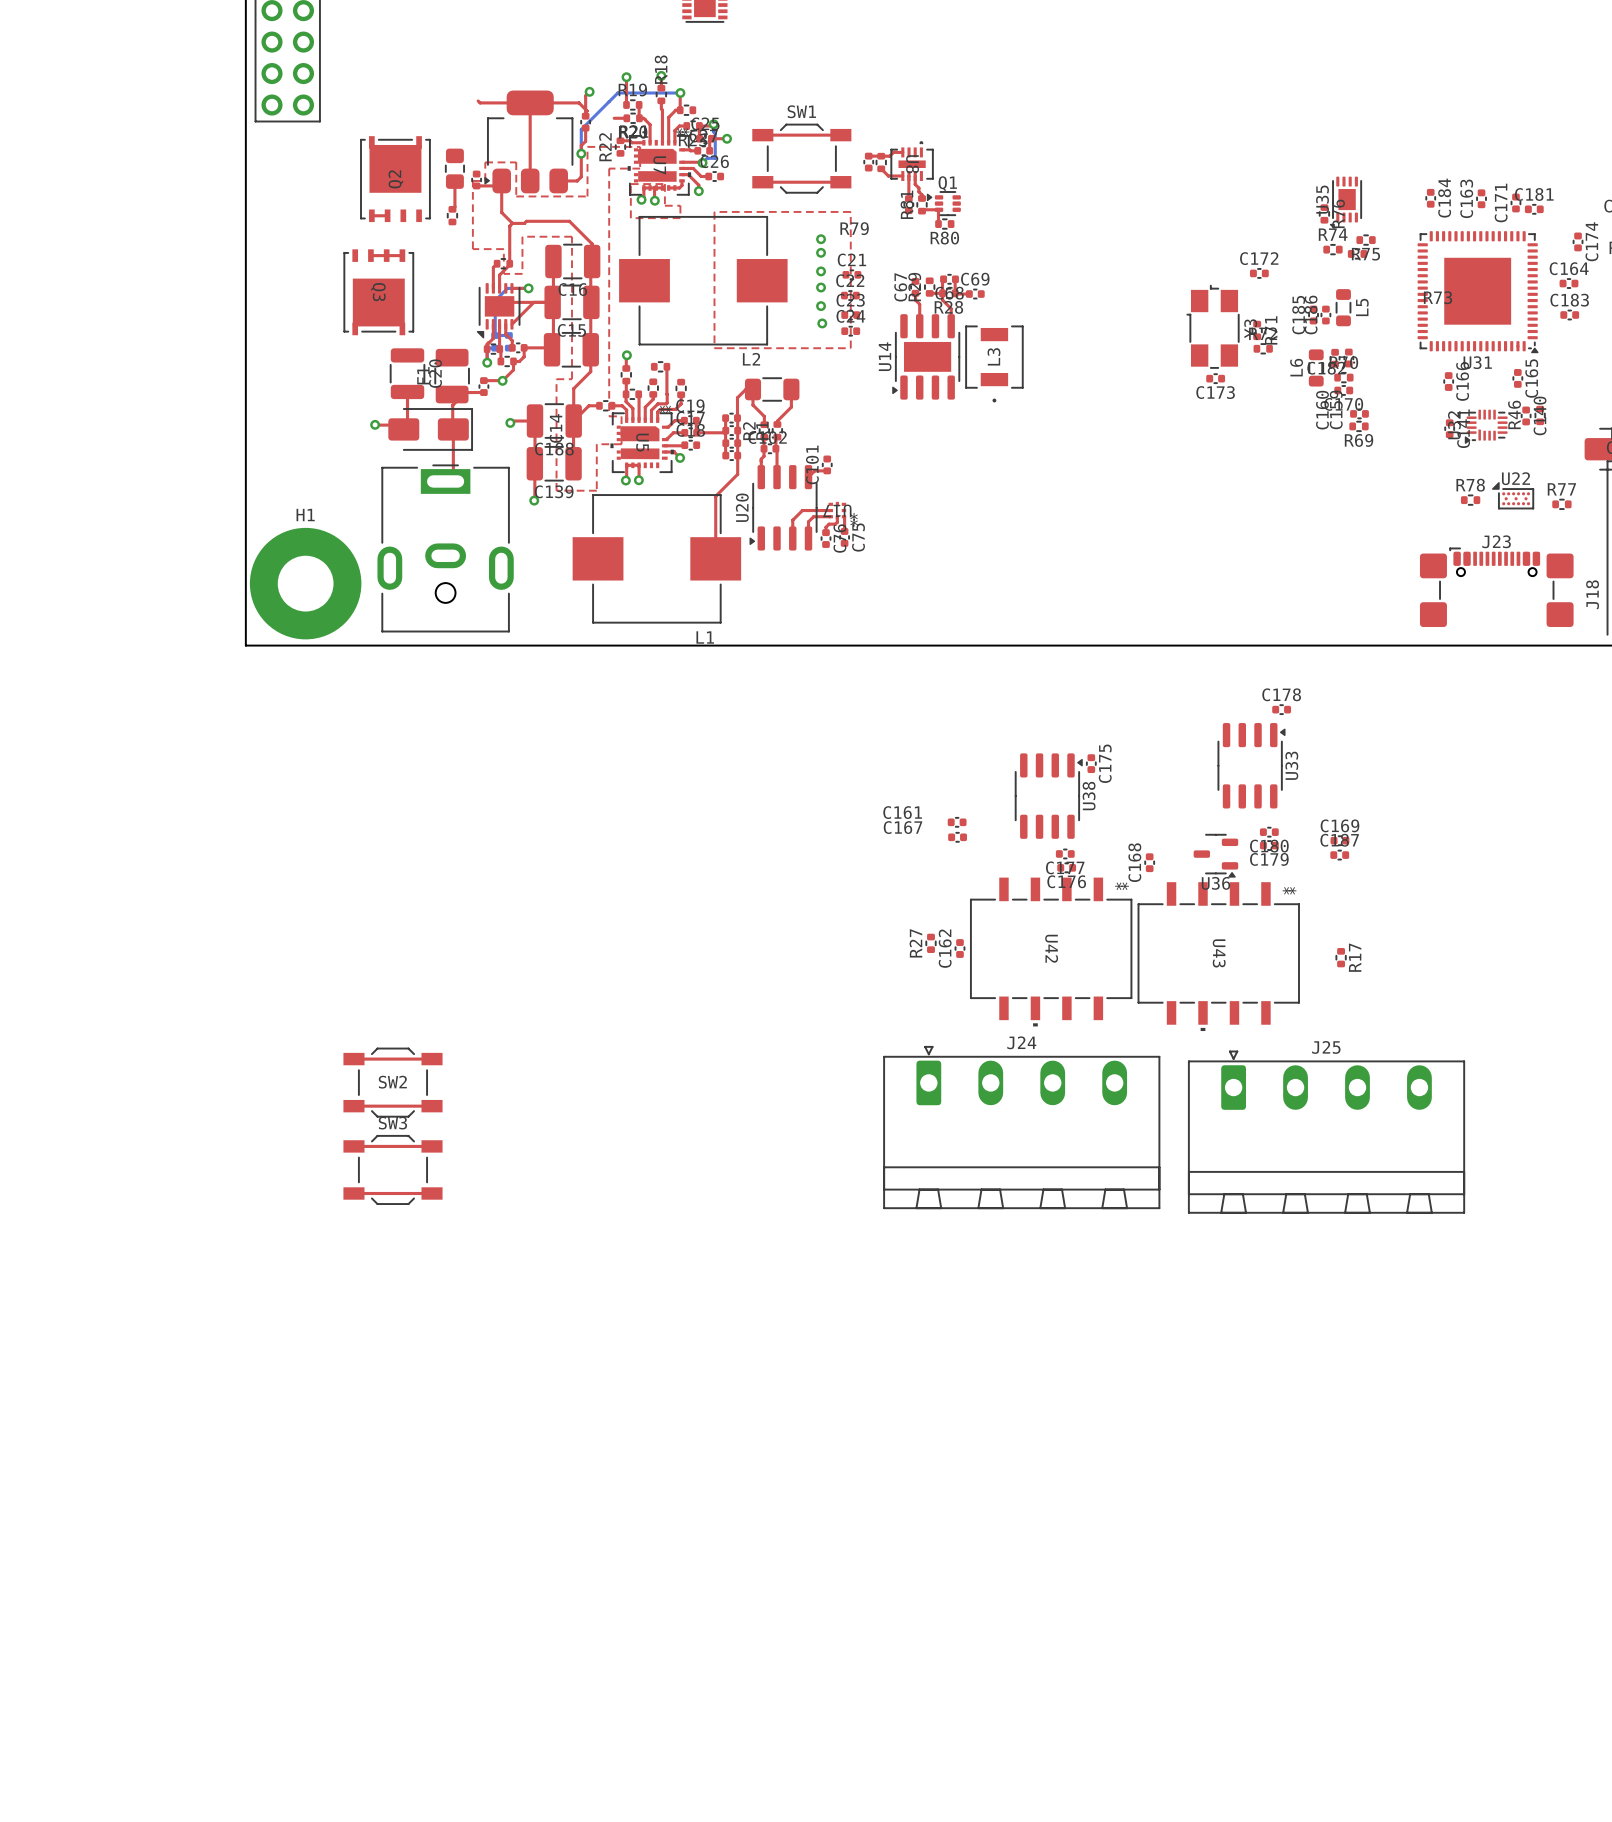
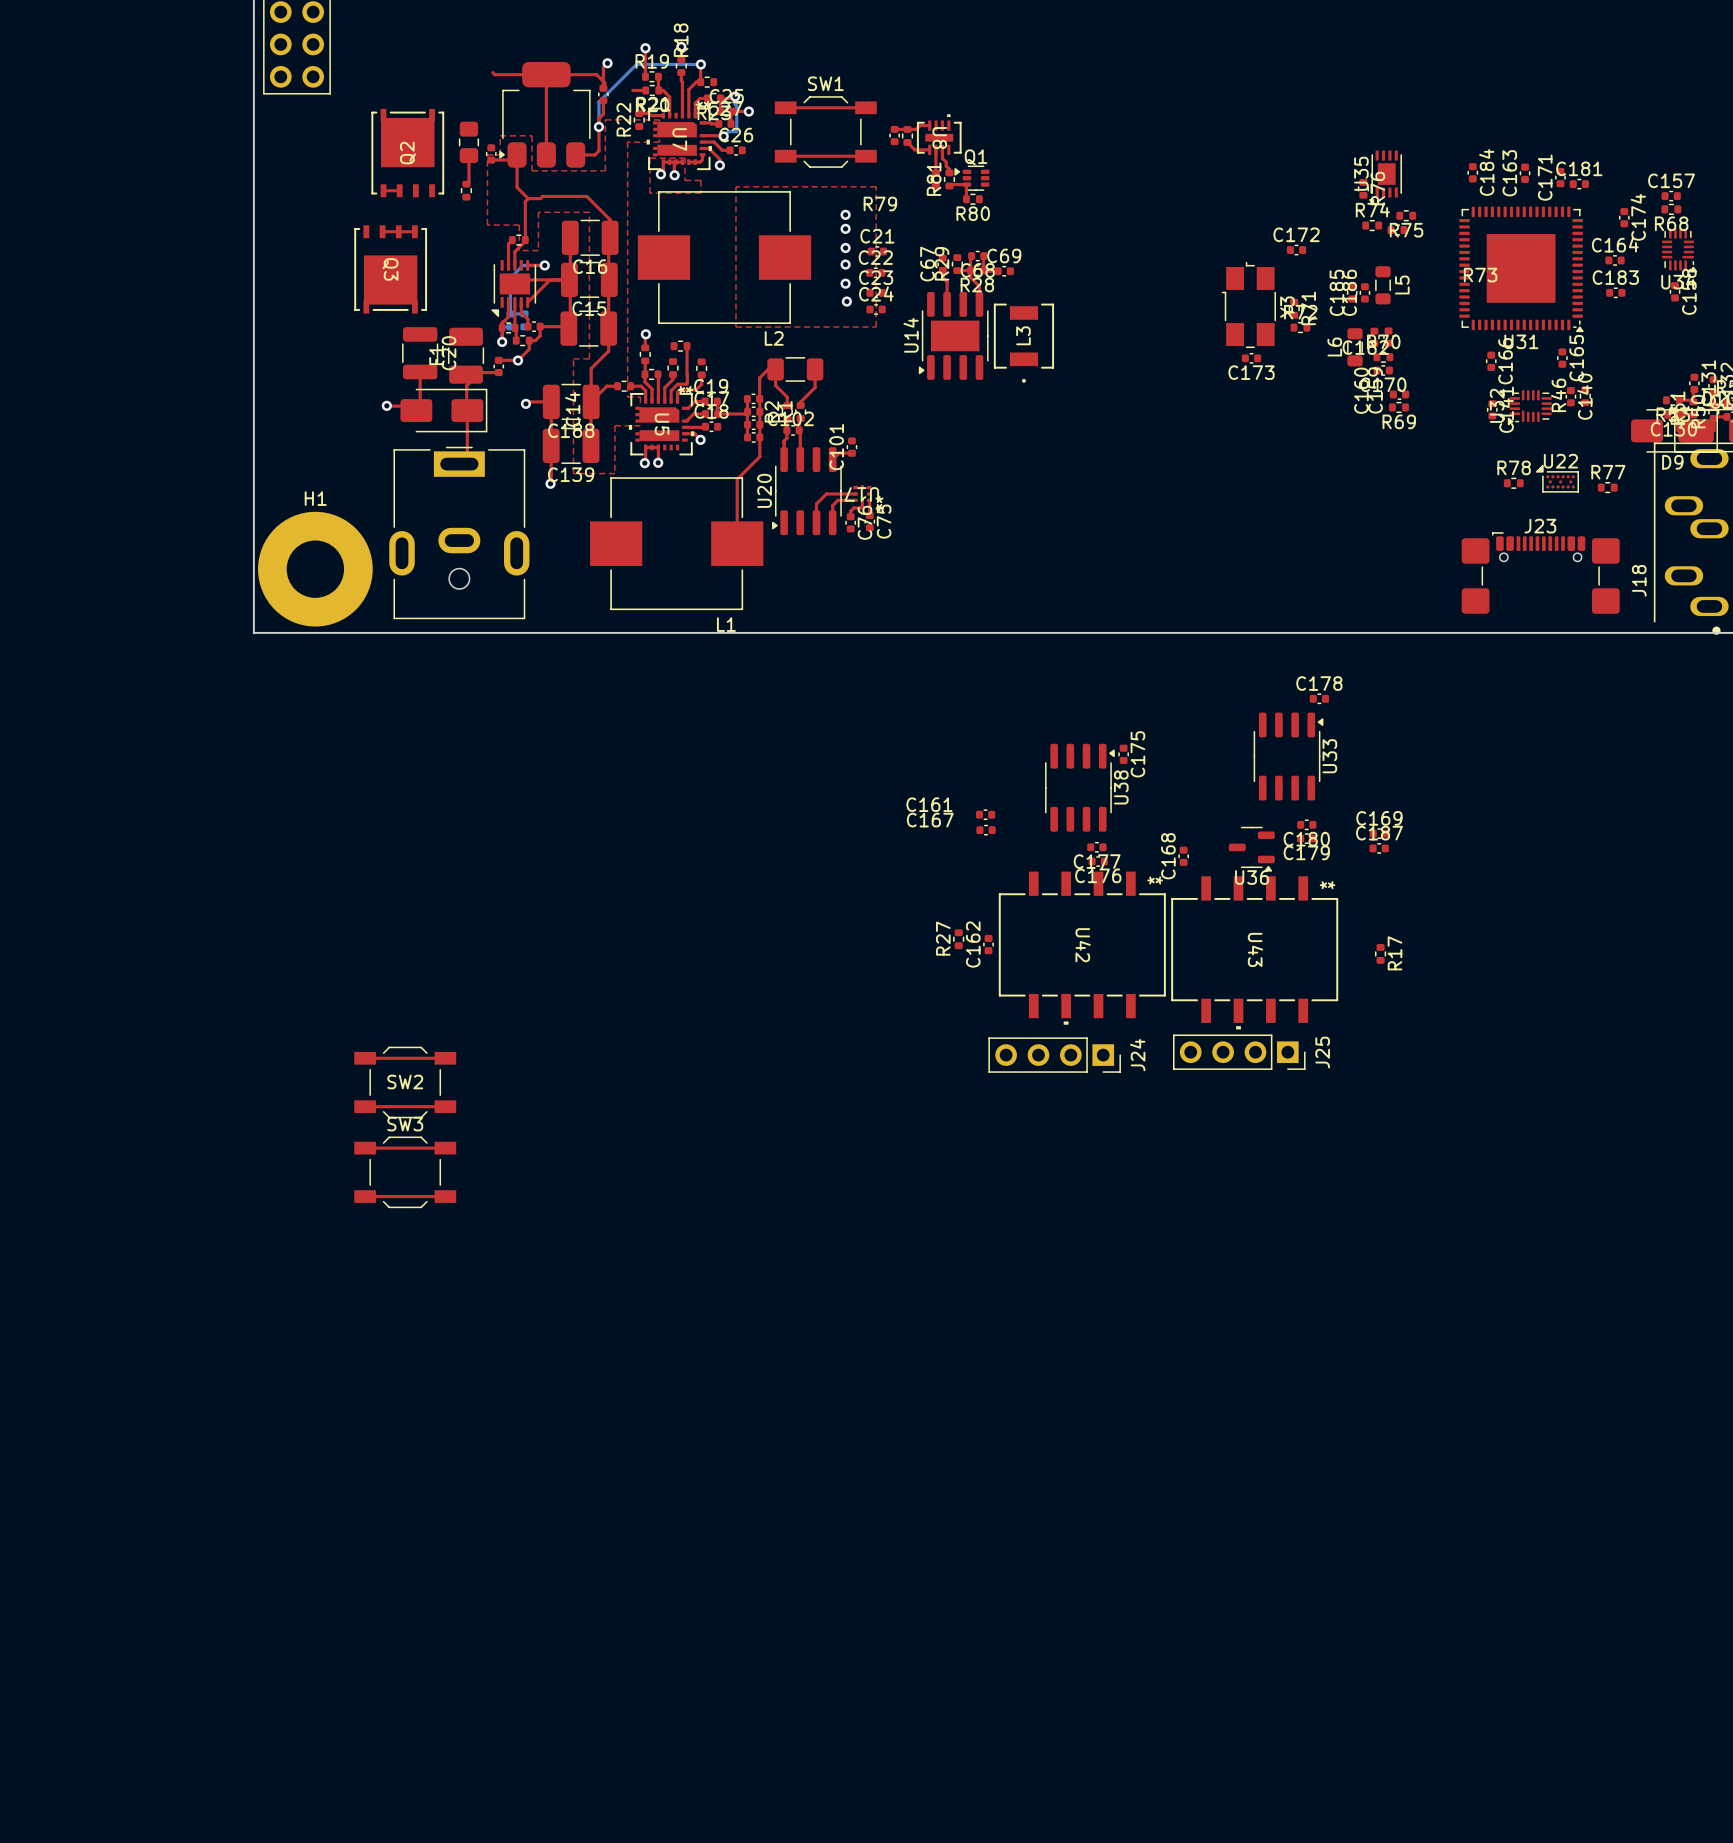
J24 name position: J24 (1021, 1042) -> J24 (1137, 1055)
J24 footprint: [883, 1046, 1161, 1209] -> [988, 1037, 1121, 1073]
J25 name position: J25 (1326, 1047) -> J25 (1322, 1052)
J25 footprint: [1188, 1050, 1465, 1214] -> [1173, 1034, 1306, 1070]

